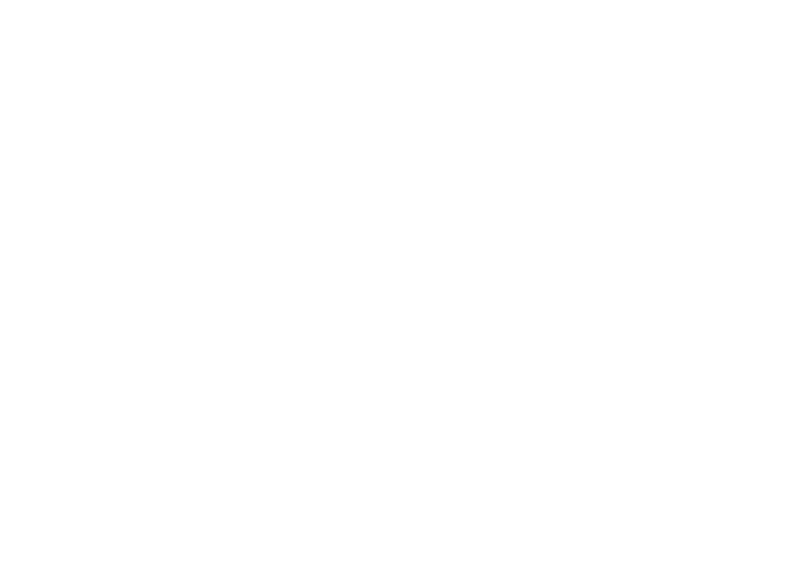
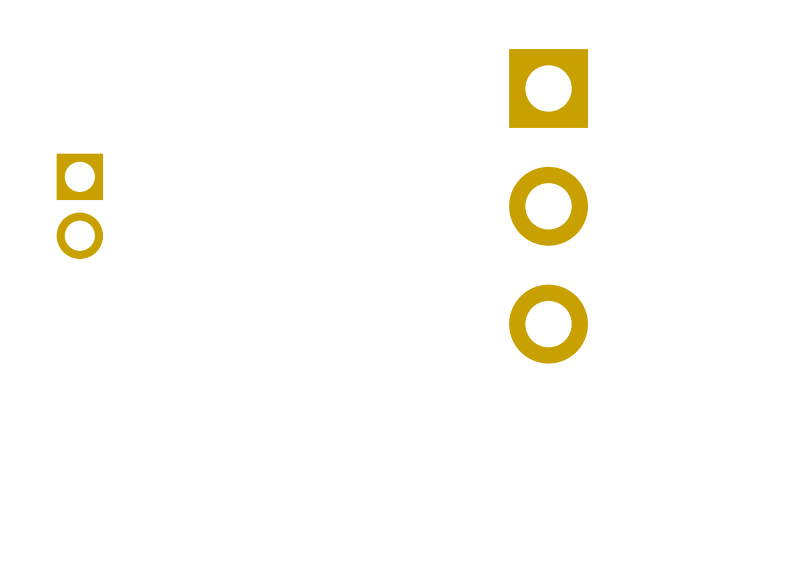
part: none -> (79, 206)
part: none -> (548, 206)

